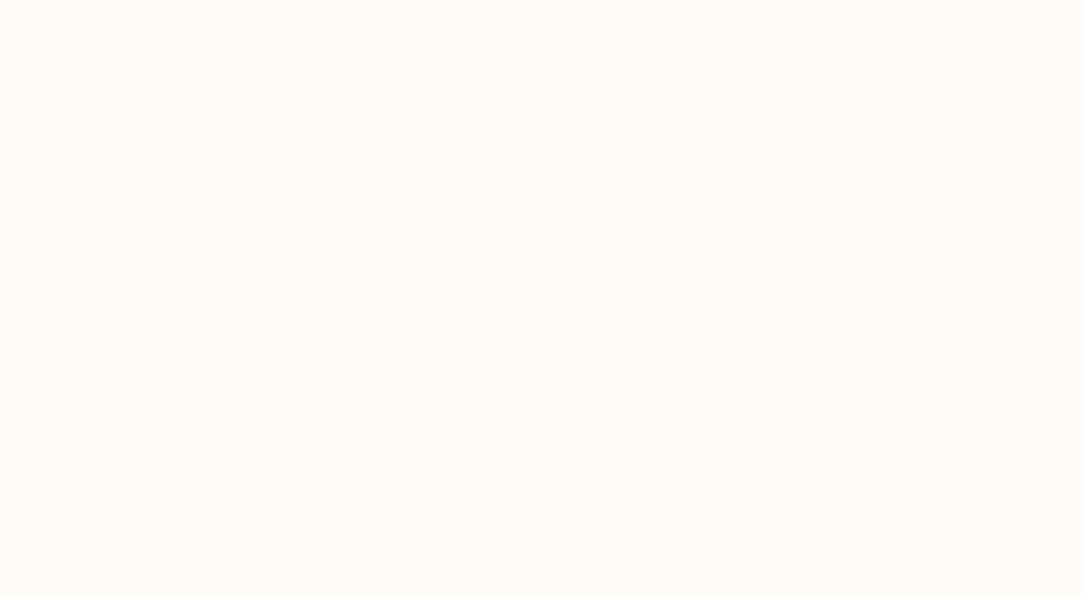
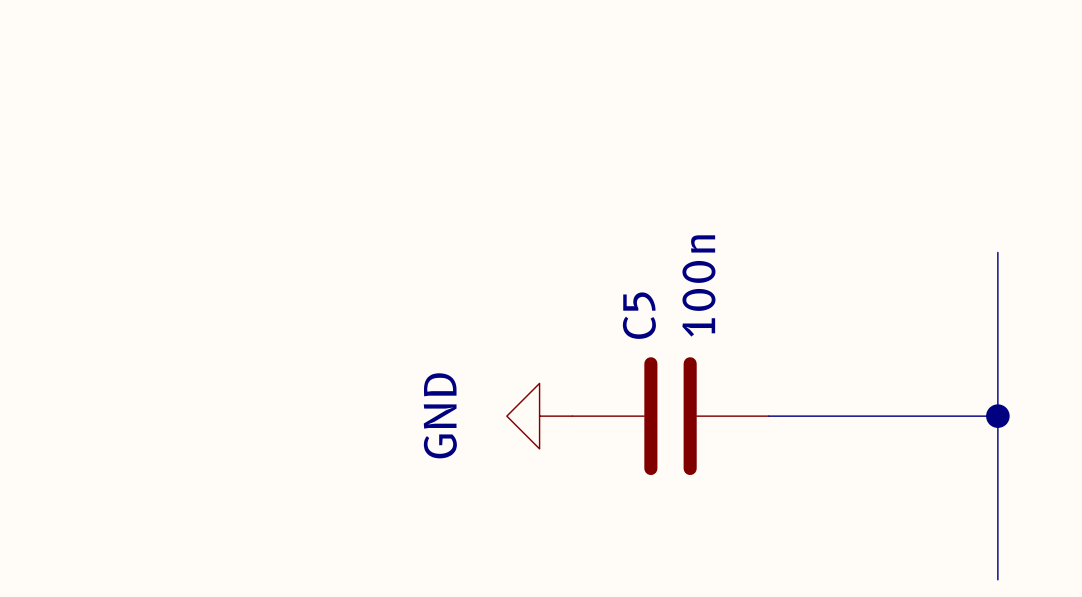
wire: none -> (997, 252) (997, 579)
power symbol: none -> GND (539, 416)
C5: none -> 100n (670, 416)
wire: none -> (768, 416) (997, 416)
junction: none -> (997, 416)

